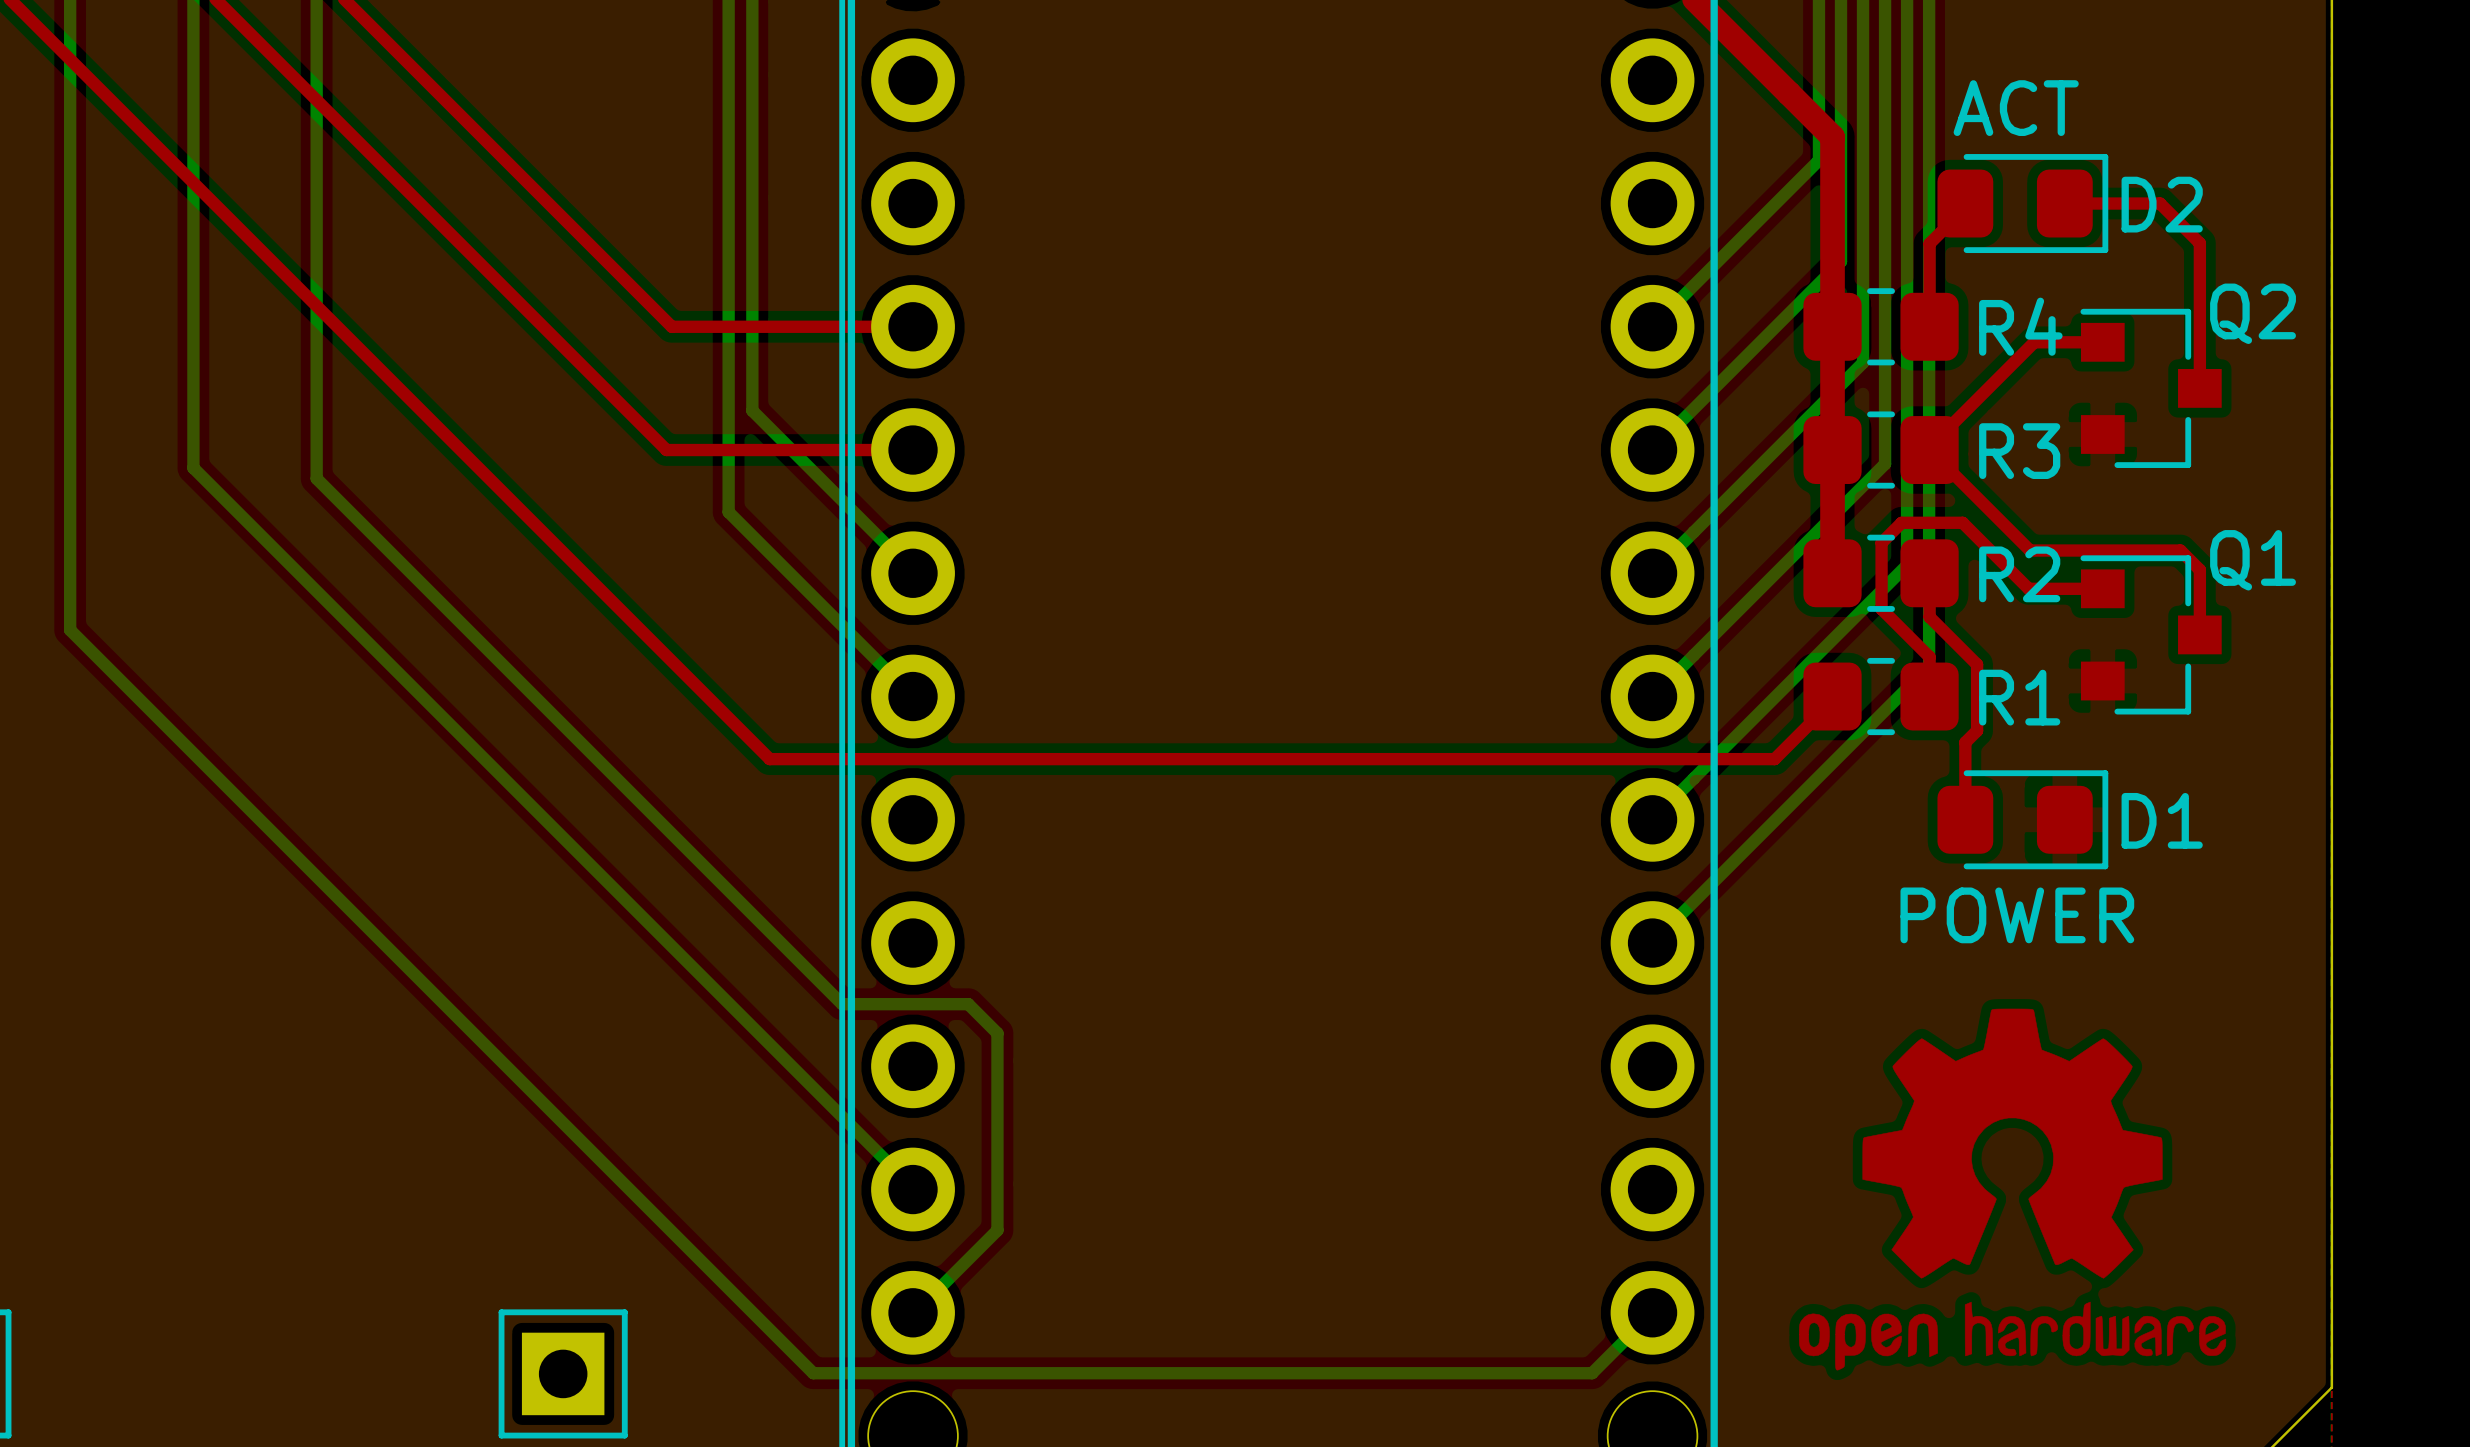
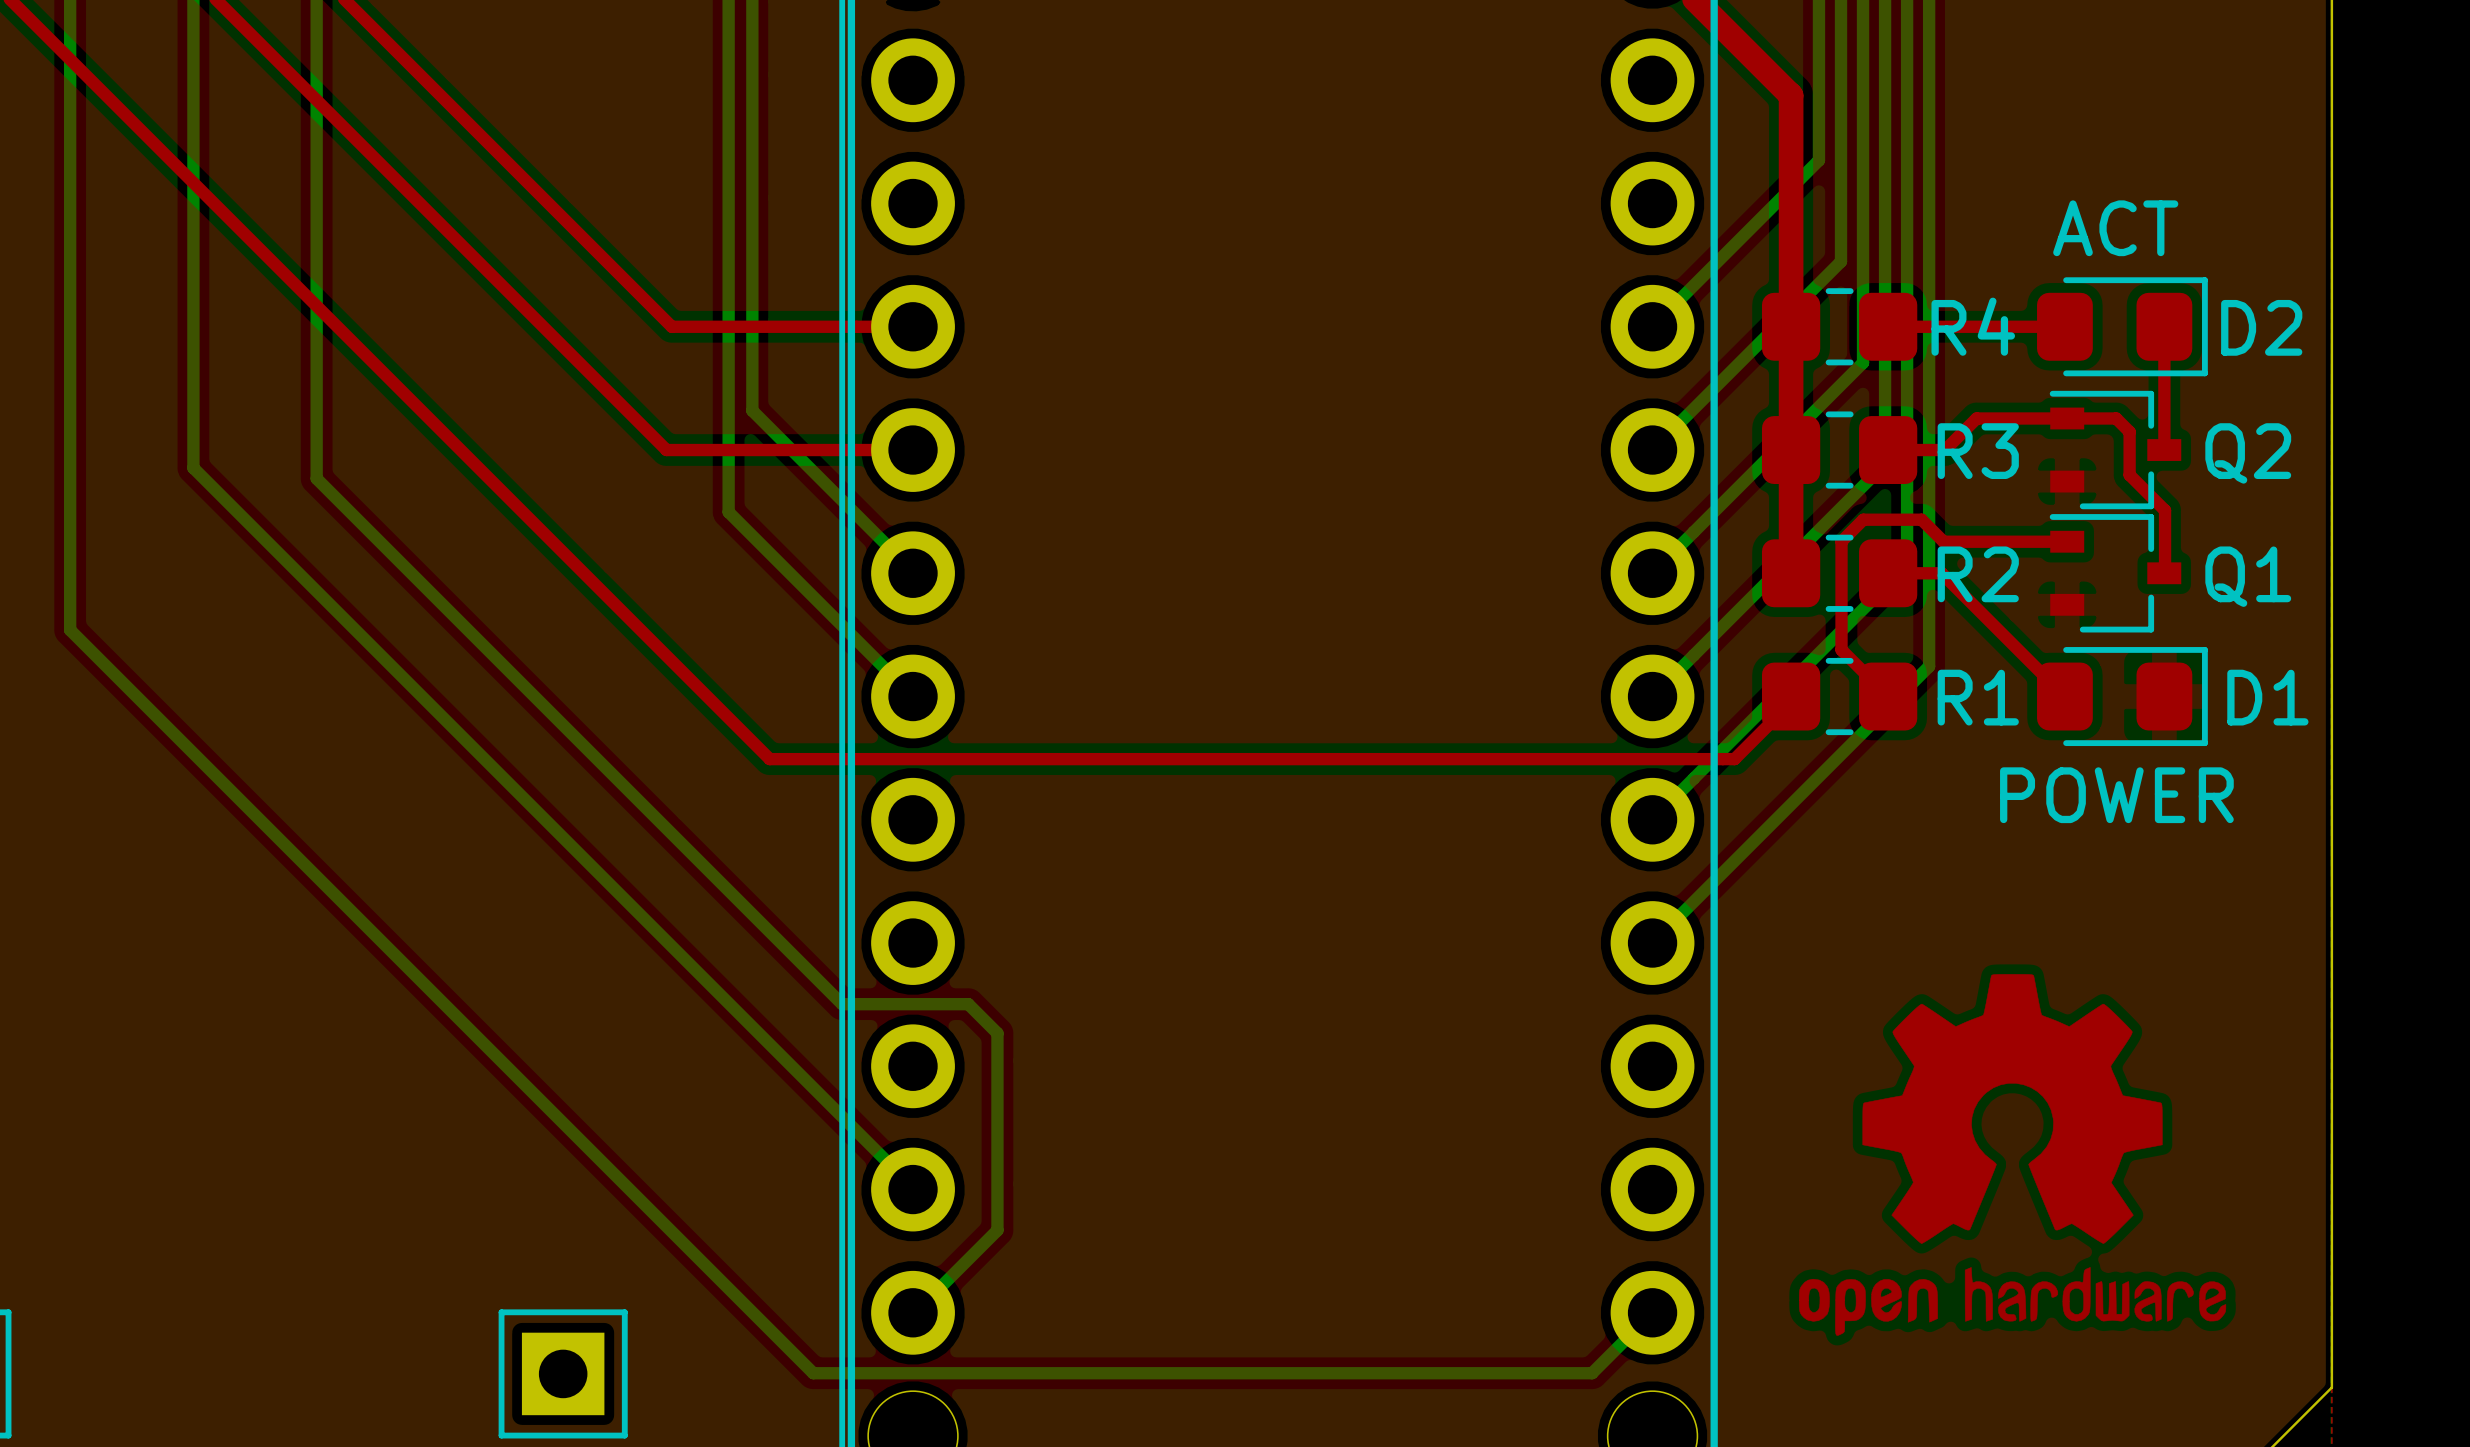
top track: (1791, 95) (1832, 137) (1832, 573) -> (1791, 95) (1791, 573)
text position: ACT (2016, 108) -> ACT (2115, 228)
top track: (1965, 203) (1965, 207) (1929, 243) (1929, 326) -> none
D2 position: (2022, 203) -> (2122, 326)
top track: (2064, 203) (2160, 203) (2199, 243) (2199, 388) -> none
Q2 footprint: [2080, 308, 2222, 468] -> [2049, 390, 2182, 510]
R4 position: (1881, 326) -> (1839, 326)
top track: none -> (1888, 326) (2064, 326)
R4 name position: R4 (2020, 326) -> R4 (1973, 326)
top track: none -> (2164, 326) (2164, 449)
top track: (2102, 342) (2034, 342) (1929, 447) (1929, 450) (2030, 550) (2180, 550) (2199, 569) (2199, 634) -> none
R3 position: (1881, 450) -> (1839, 450)
top track: none -> (1888, 450) (1945, 450) (1976, 418) (2116, 418) (2129, 431) (2129, 475) (2165, 510) (2165, 565) (2156, 573) (2164, 573)
top track: none -> (2067, 541) (1943, 541) (1921, 519) (1863, 519) (1841, 541) (1841, 649) (1888, 696)
Q1 footprint: [2080, 555, 2222, 715] -> [2049, 514, 2182, 633]
R2 position: (1881, 573) -> (1839, 573)
top track: none -> (1888, 573) (1941, 573) (2064, 696)
top track: (1929, 573) (1929, 617) (1977, 664) (1977, 730) (1965, 742) (1965, 819) -> none
top track: (2102, 588) (2028, 588) (1962, 522) (1901, 522) (1881, 542) (1881, 609) (1929, 657) (1929, 696) -> none
top track: (1832, 696) (1832, 701) (1774, 759) (1734, 759) -> (1791, 696) (1791, 702) (1734, 759)
R1 position: (1881, 696) -> (1839, 696)
D1 position: (2022, 819) -> (2122, 696)
D1 name position: D1 (2162, 820) -> D1 (2267, 697)
text position: POWER (2017, 915) -> POWER (2116, 795)
drawing position: (2012, 1189) -> (2012, 1154)

